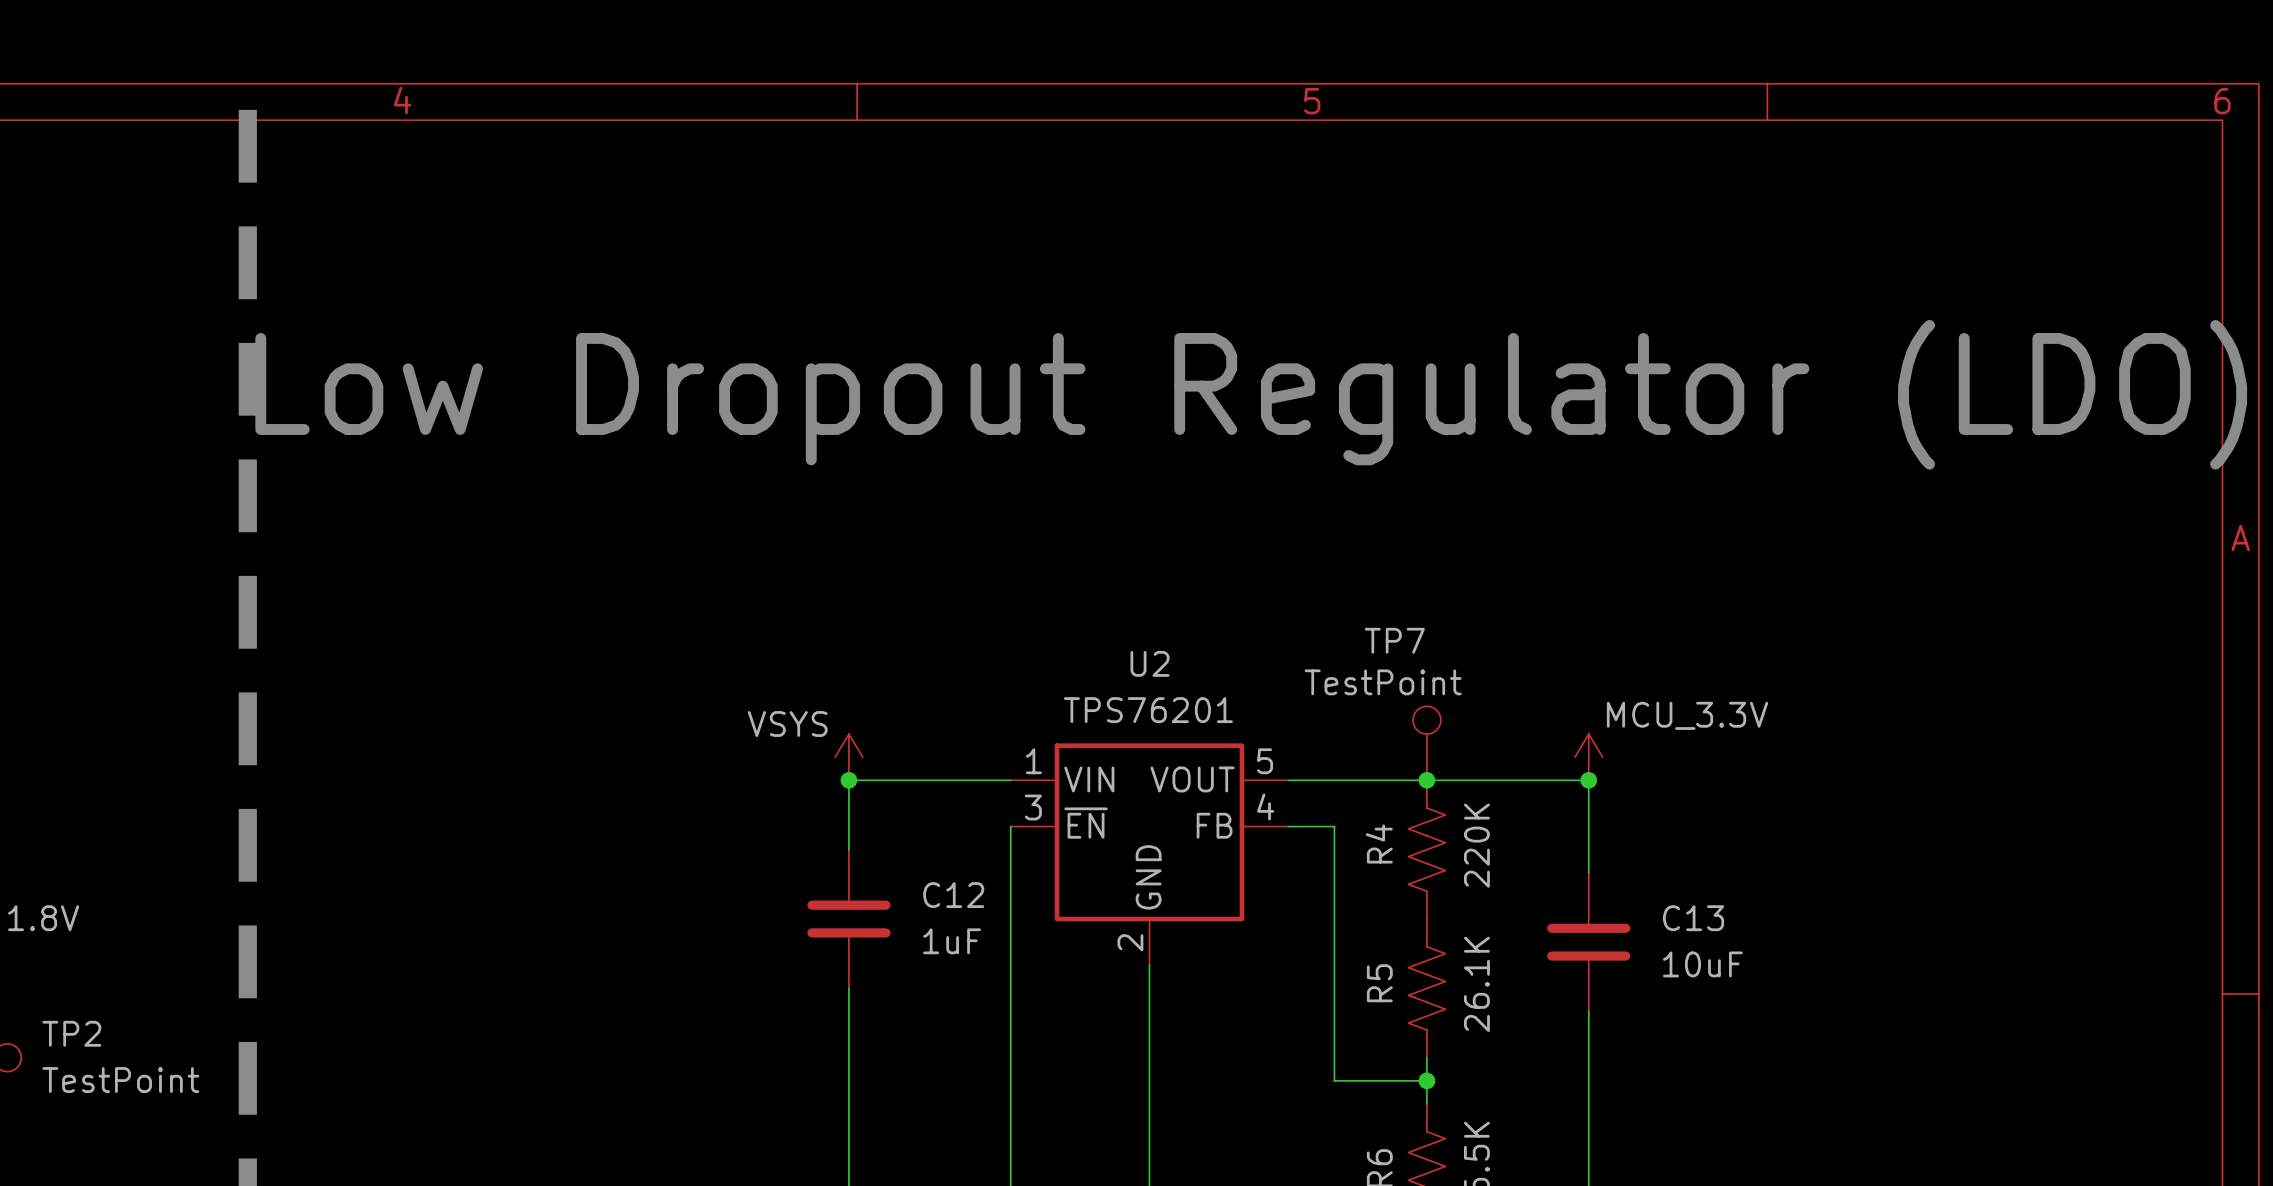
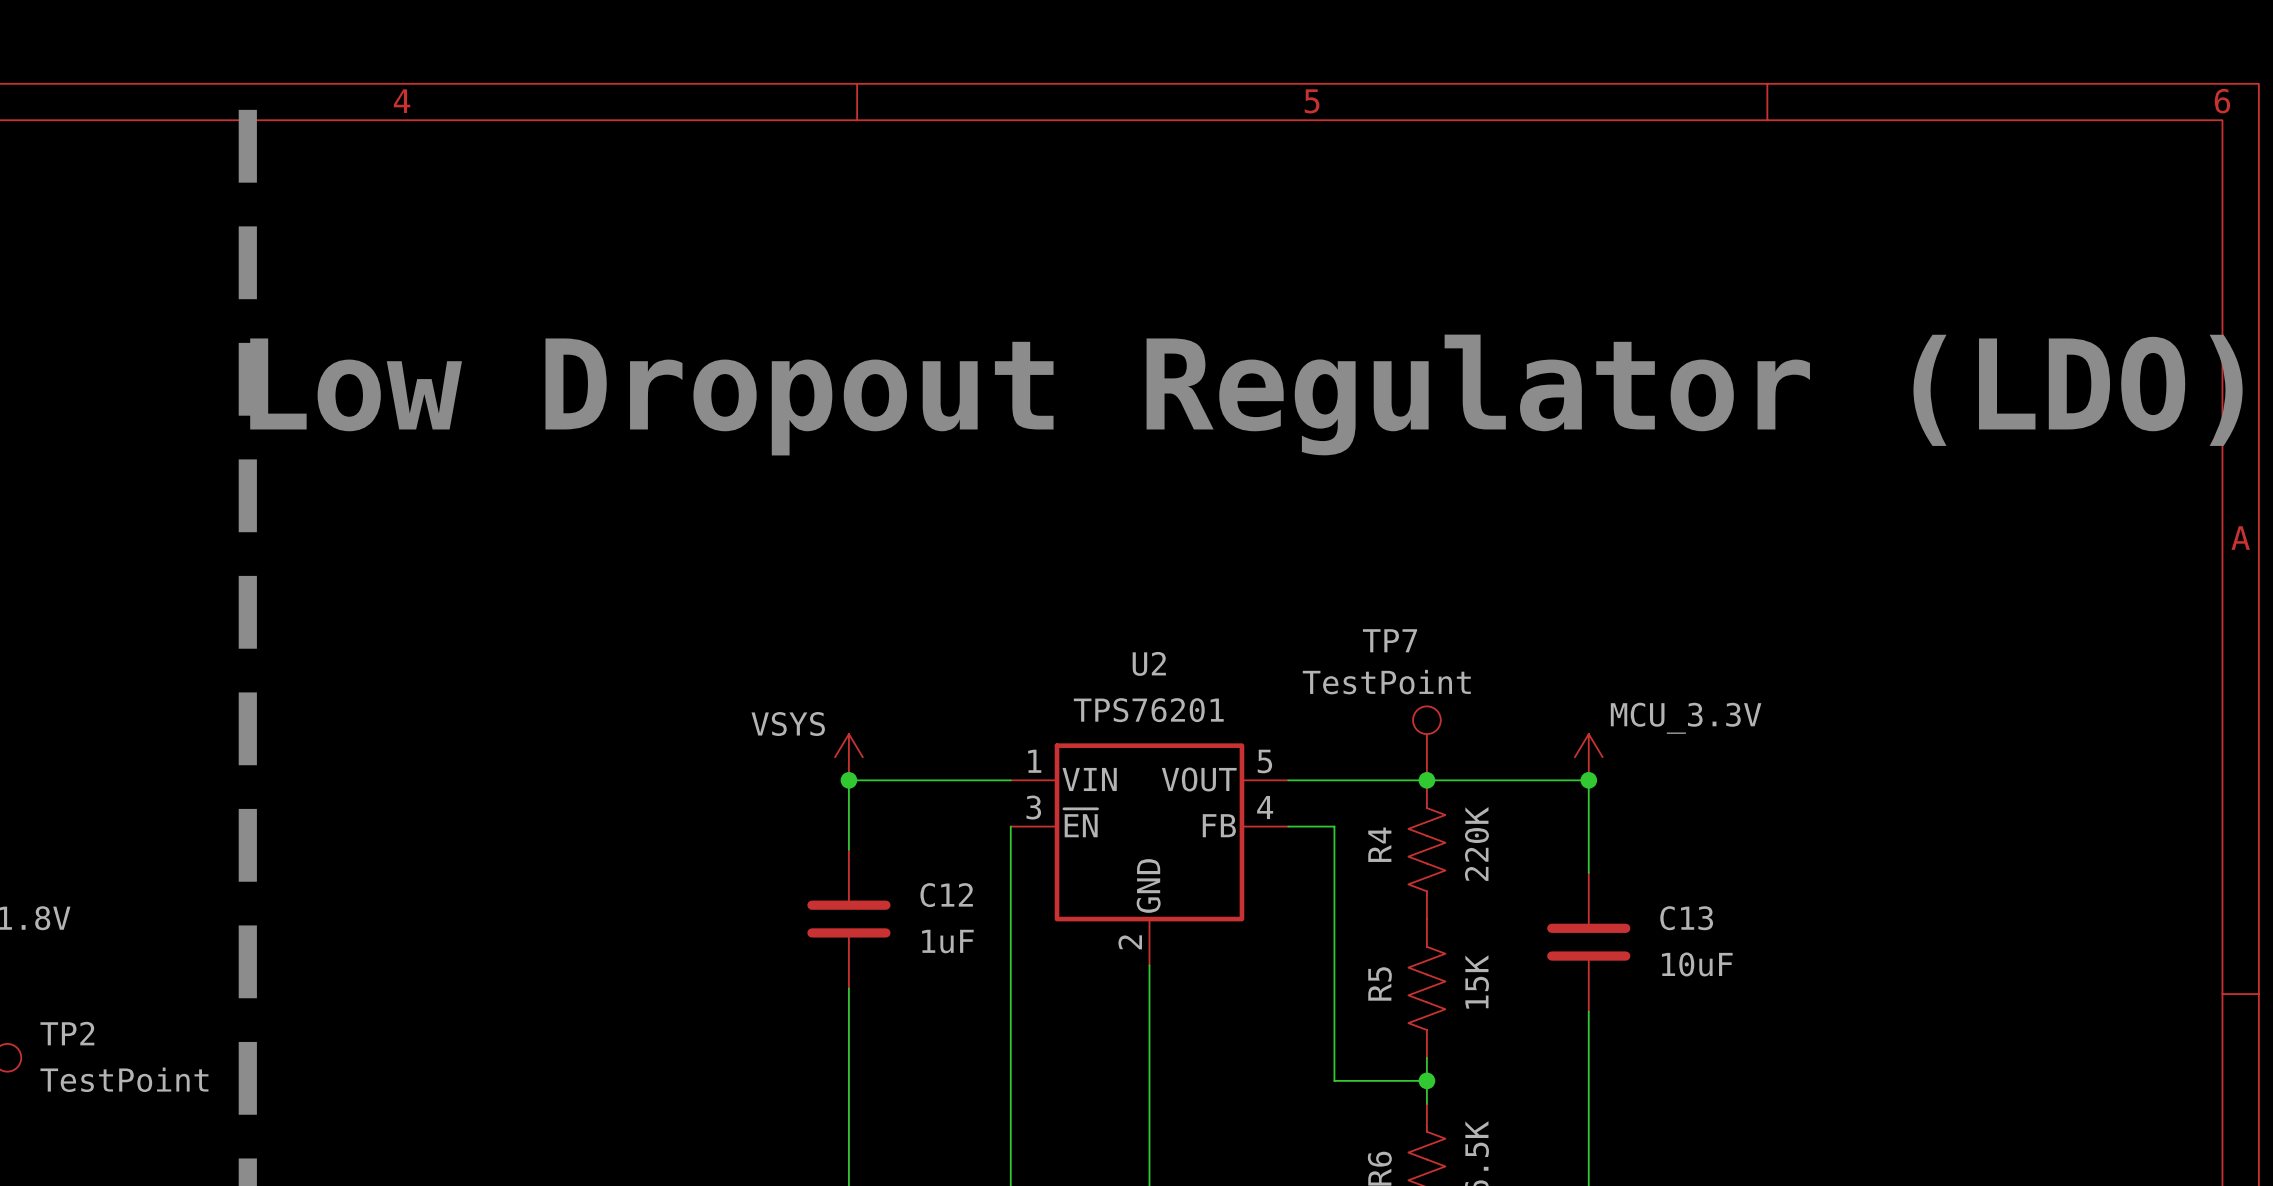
R5 value: 26.1K (1476, 984) -> 15K (1477, 981)

